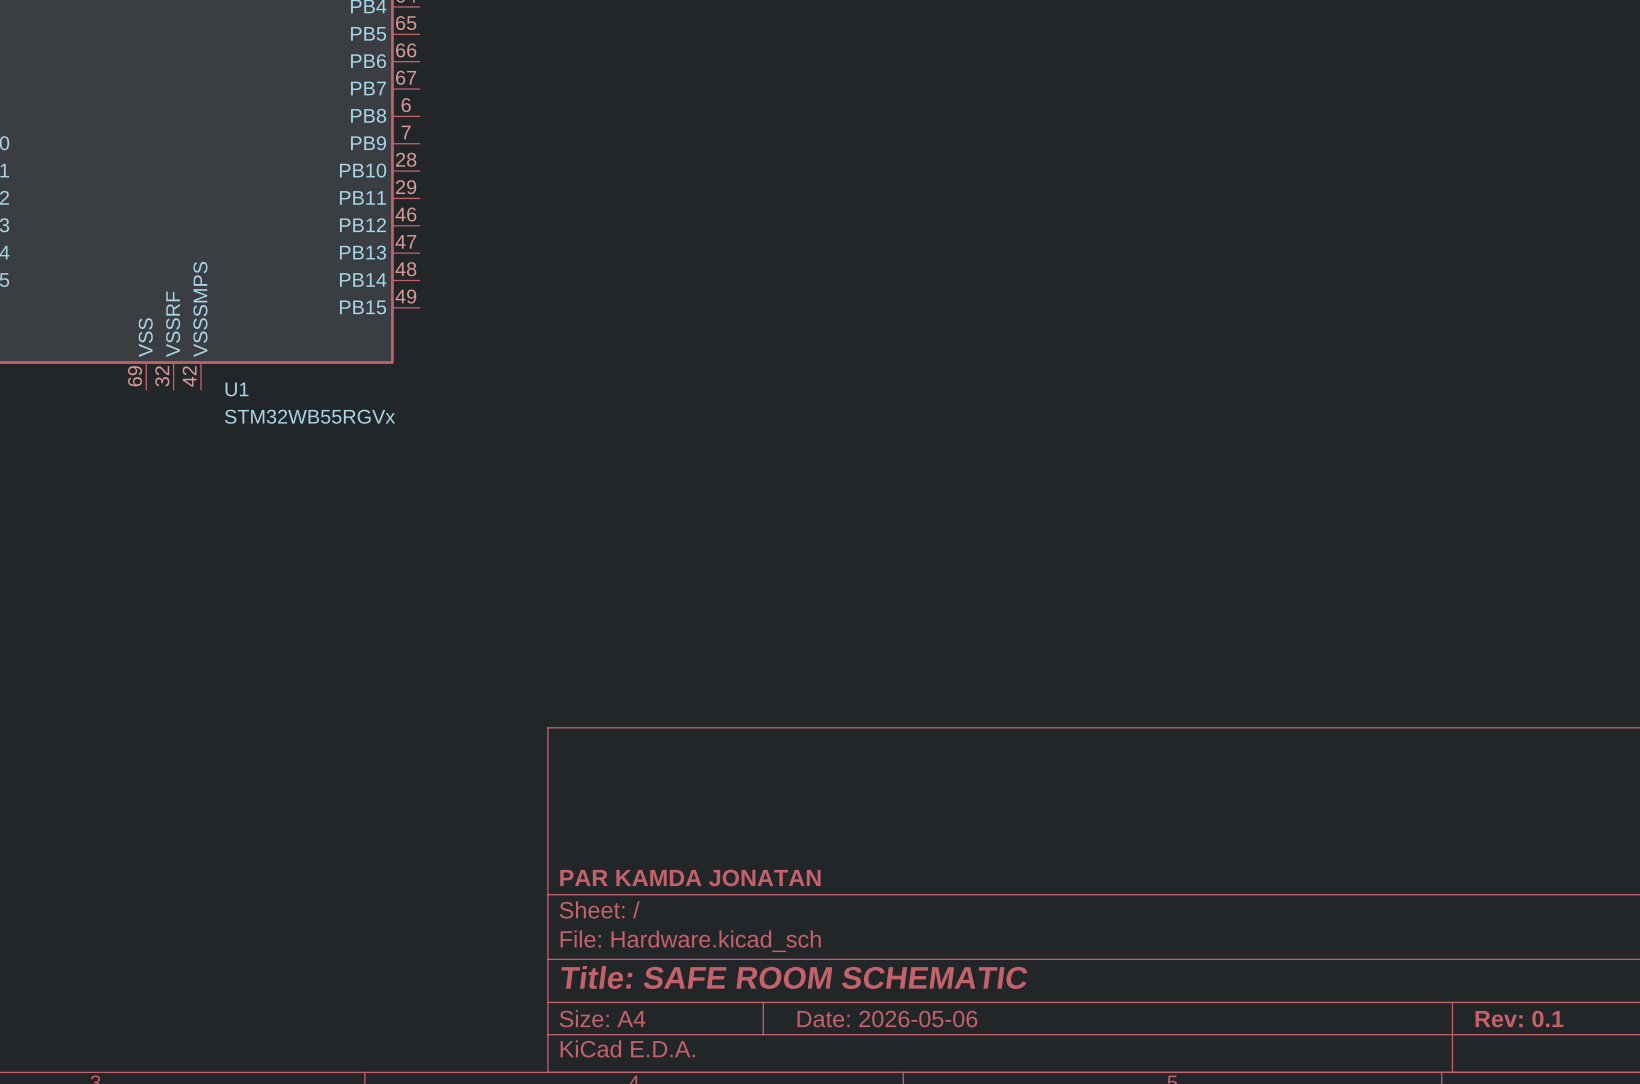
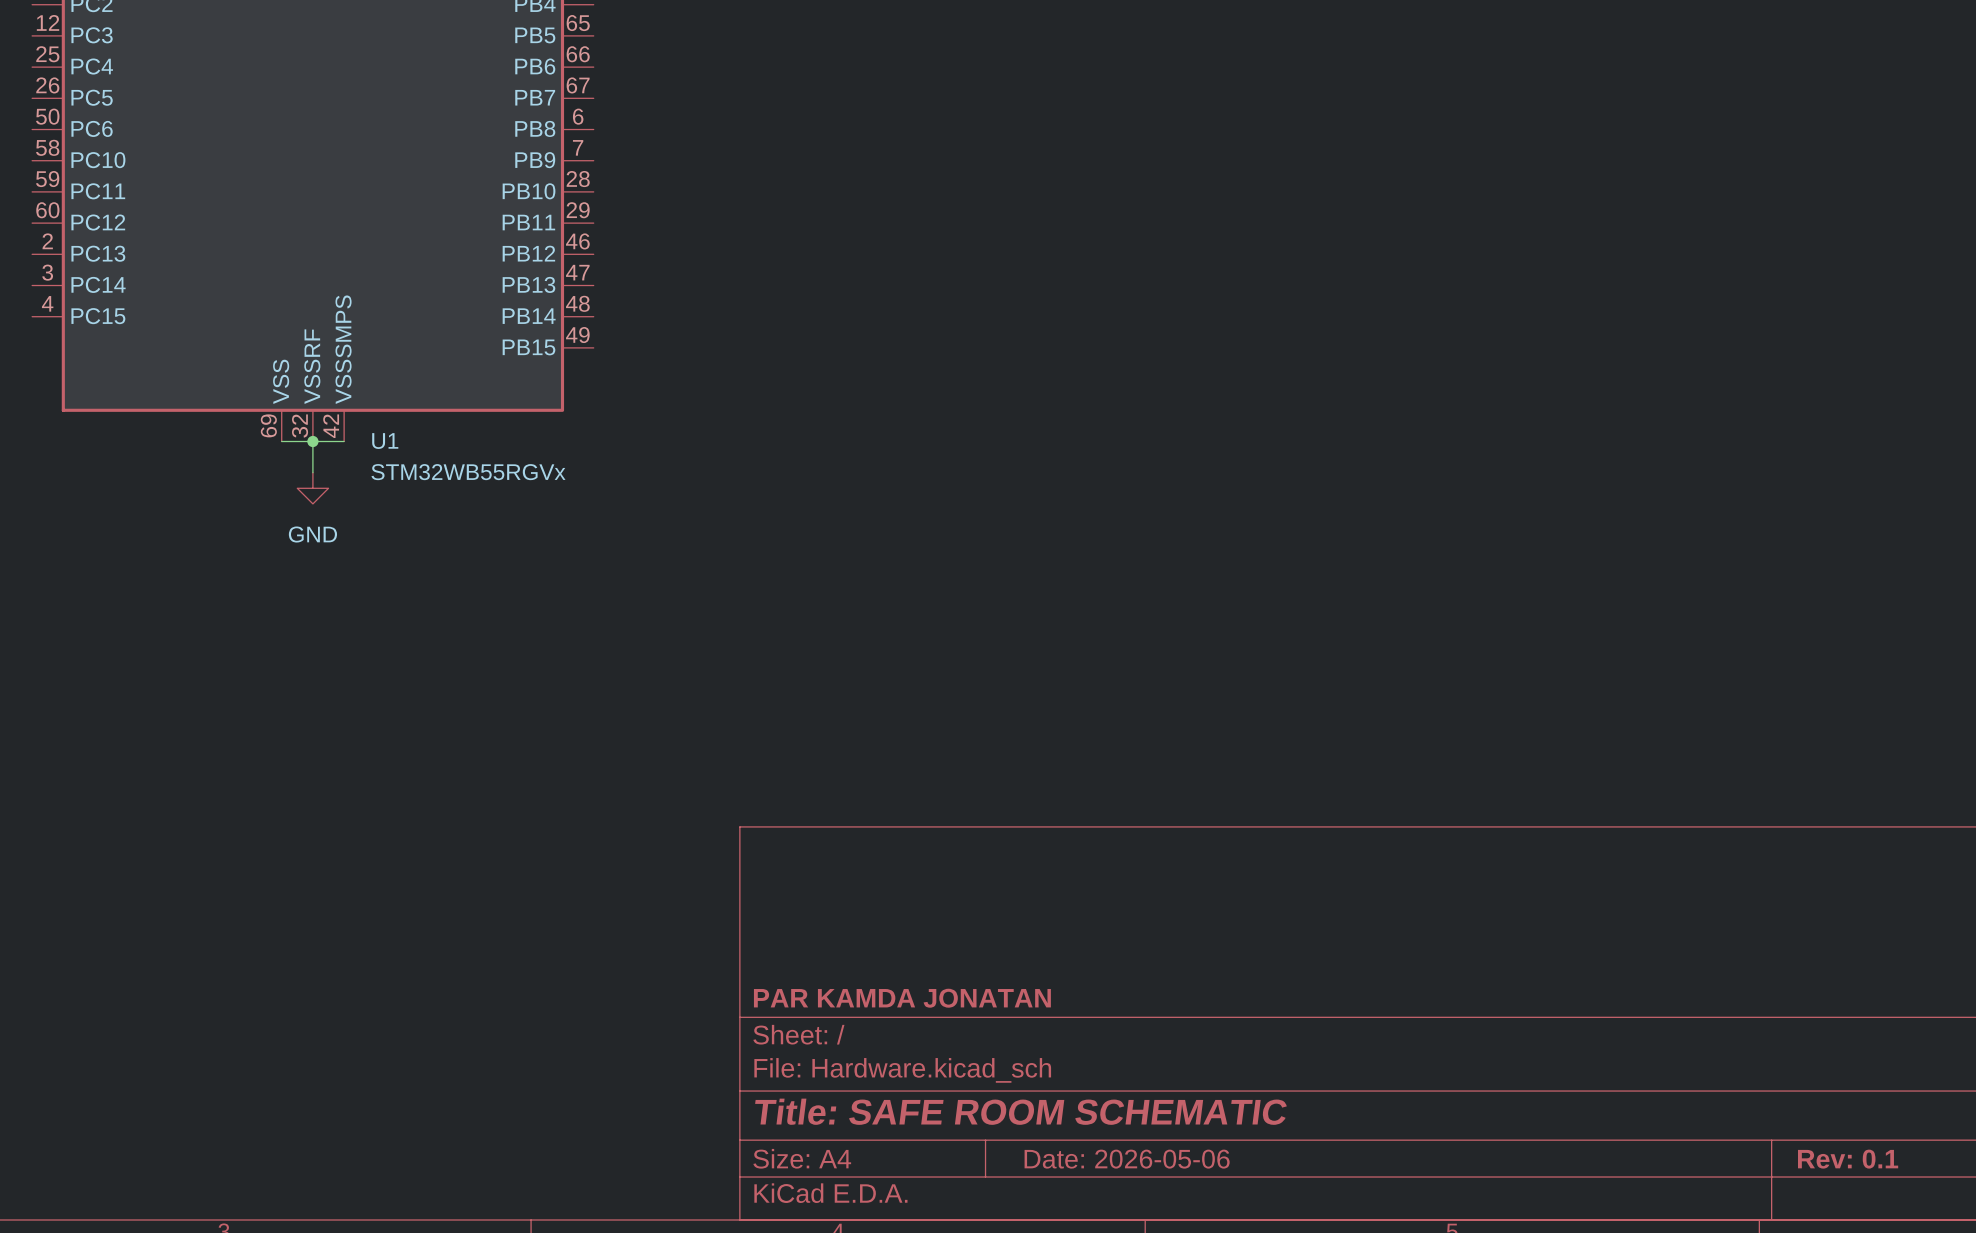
wire: none -> (281, 441) (344, 441)
wire: none -> (312, 441) (312, 472)
junction: none -> (312, 441)
power symbol: none -> GND (312, 488)

